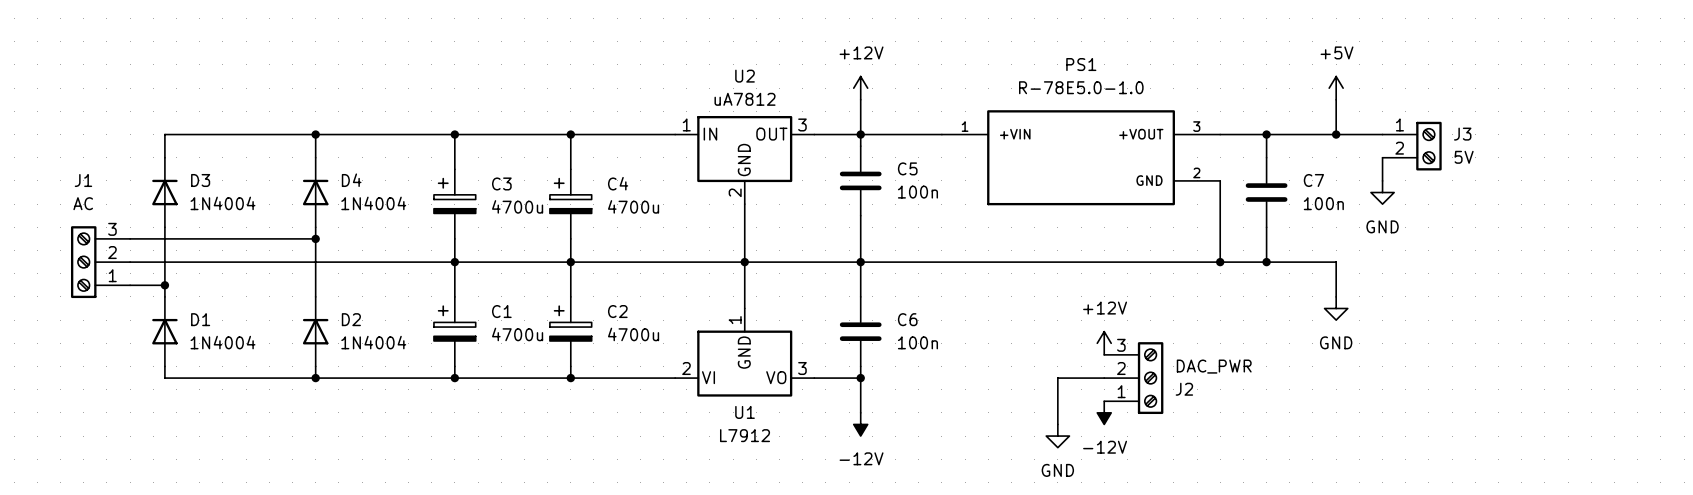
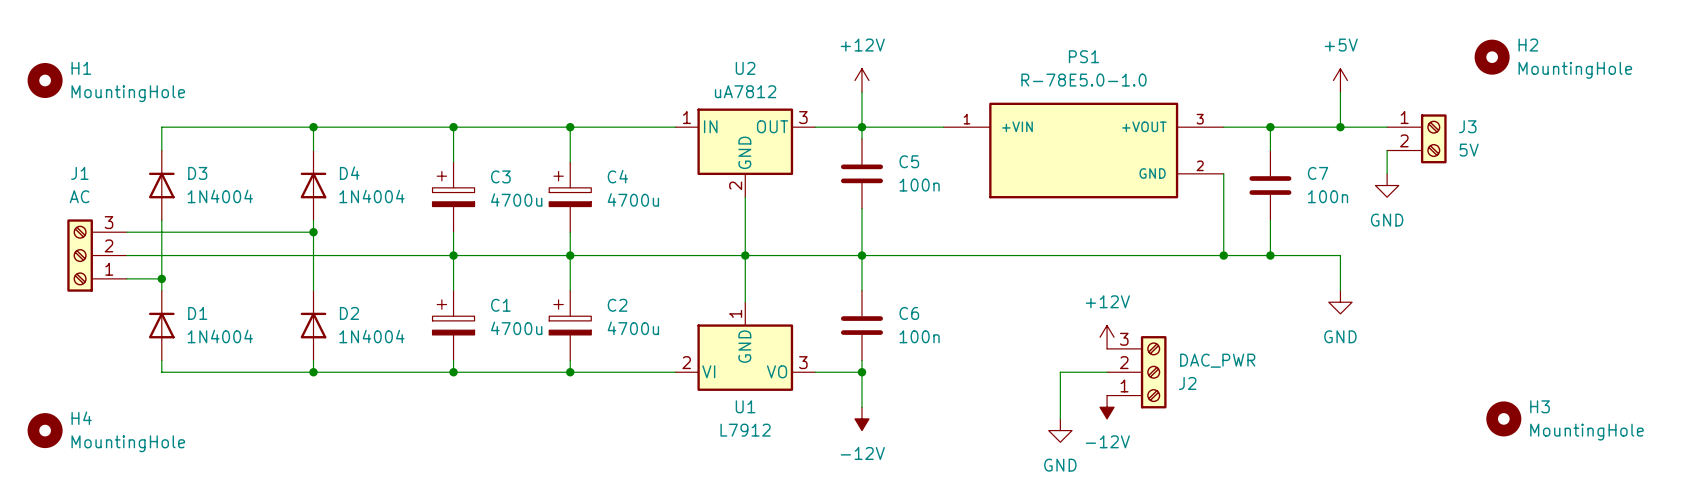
H2: none -> MountingHole (1492, 57)
H1: none -> MountingHole (45, 80)
H3: none -> MountingHole (1503, 418)
H4: none -> MountingHole (45, 430)

